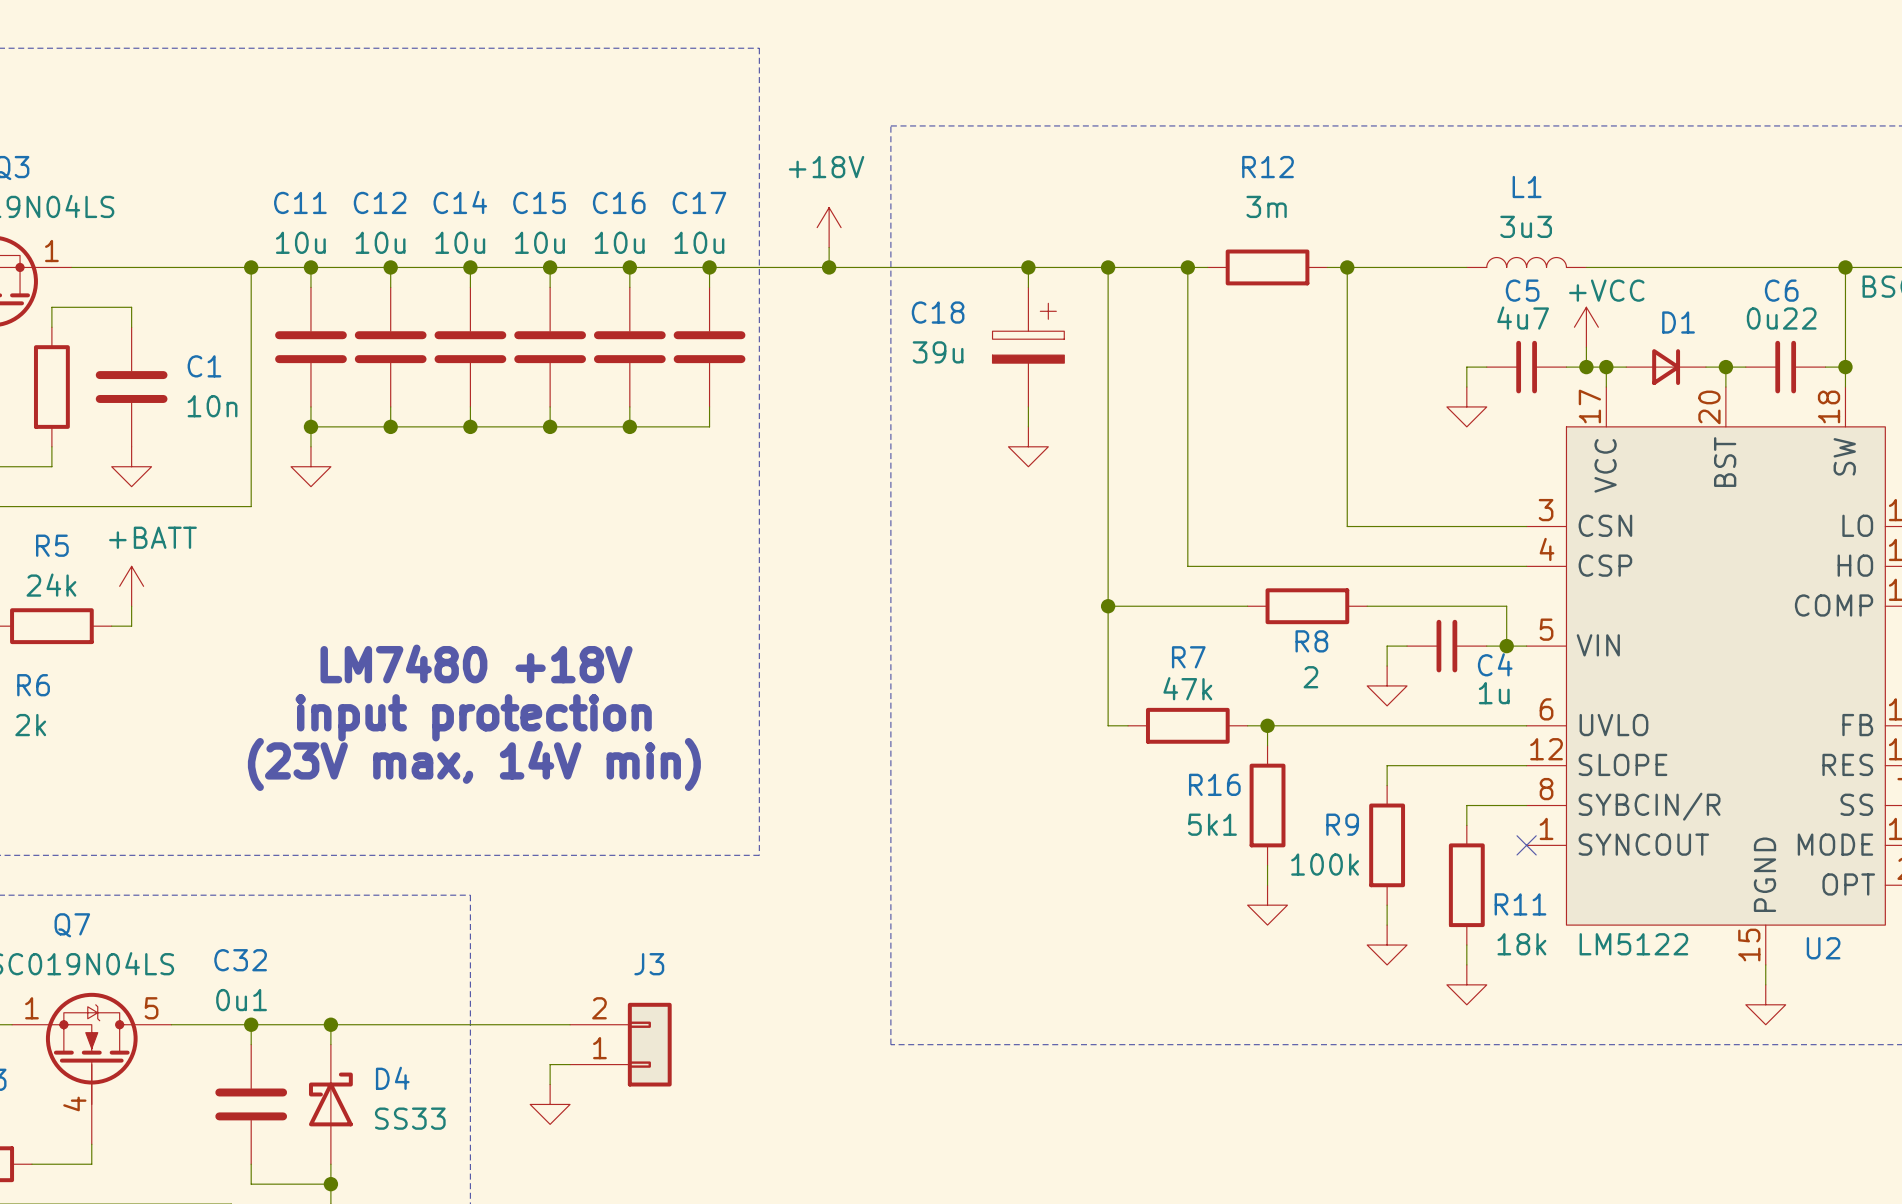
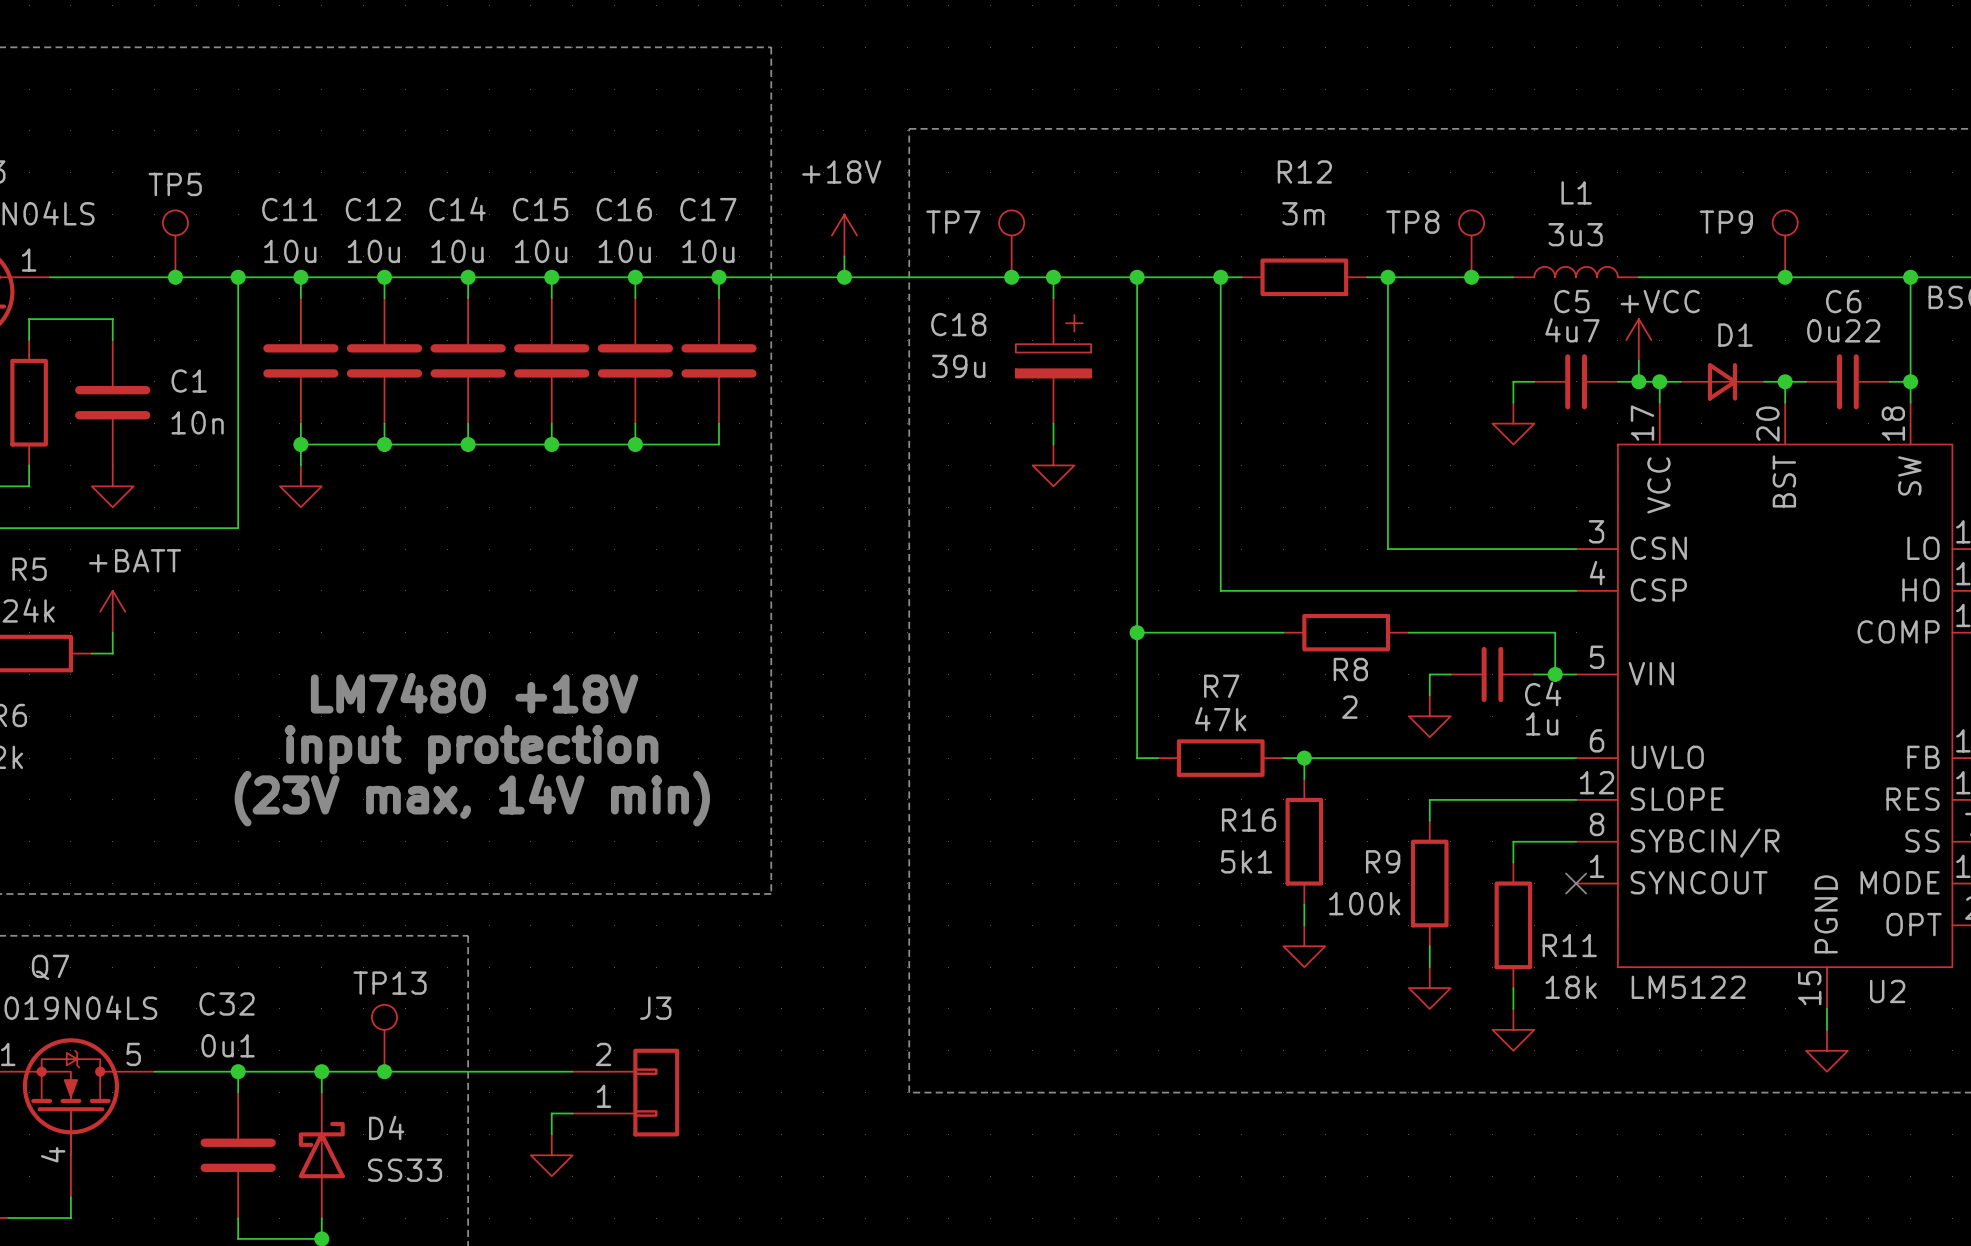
TP5: none -> (175, 243)
TP7: none -> (1011, 243)
TP8: none -> (1471, 243)
TP9: none -> (1785, 243)
junction: none -> (175, 277)
junction: none -> (1011, 277)
junction: none -> (1471, 277)
junction: none -> (1785, 277)
TP13: none -> (384, 1038)
junction: none -> (384, 1071)

